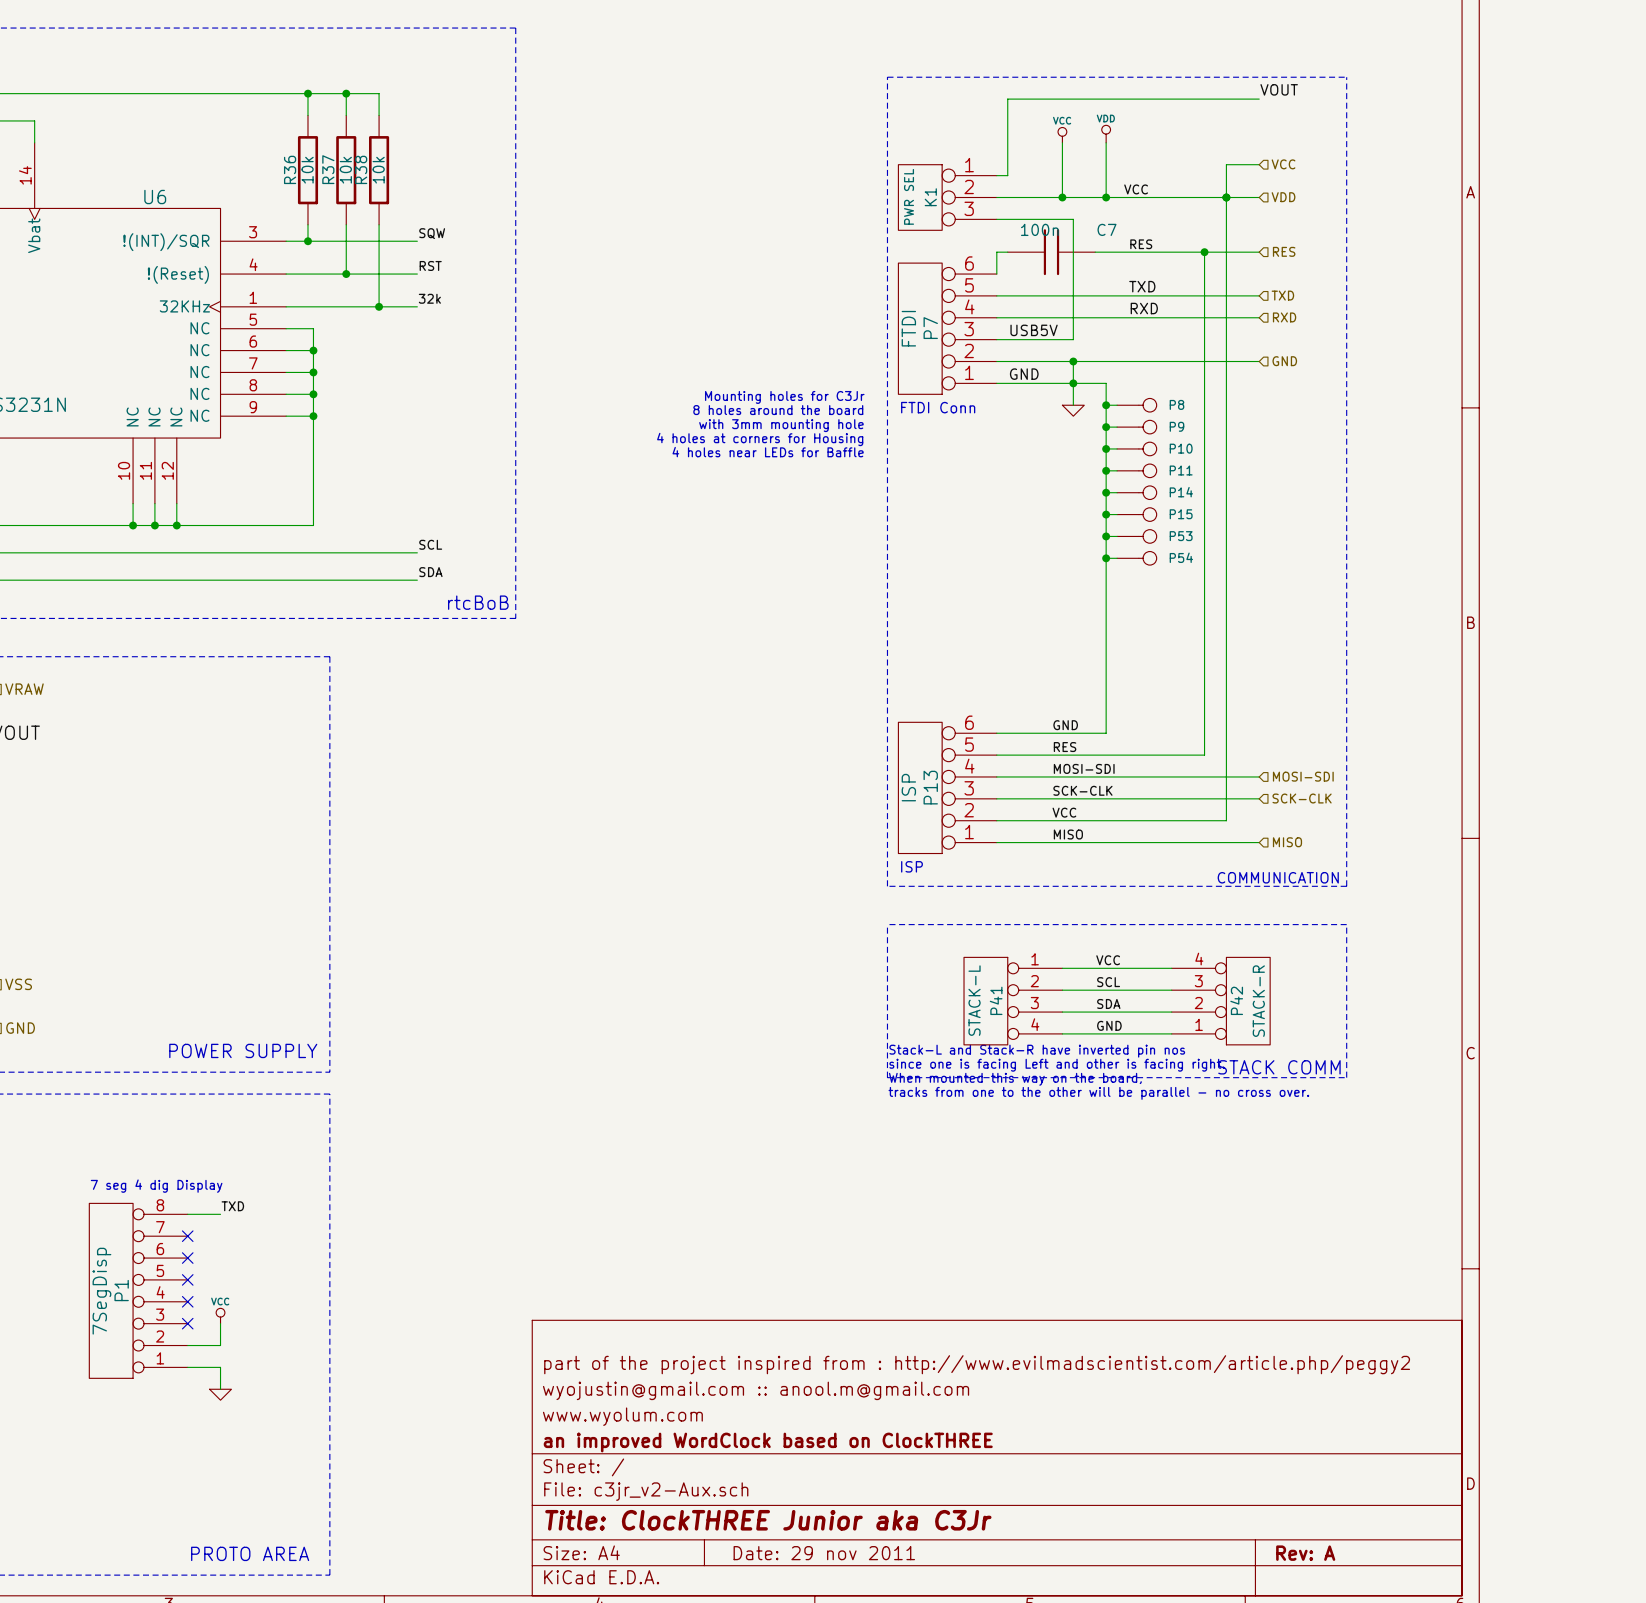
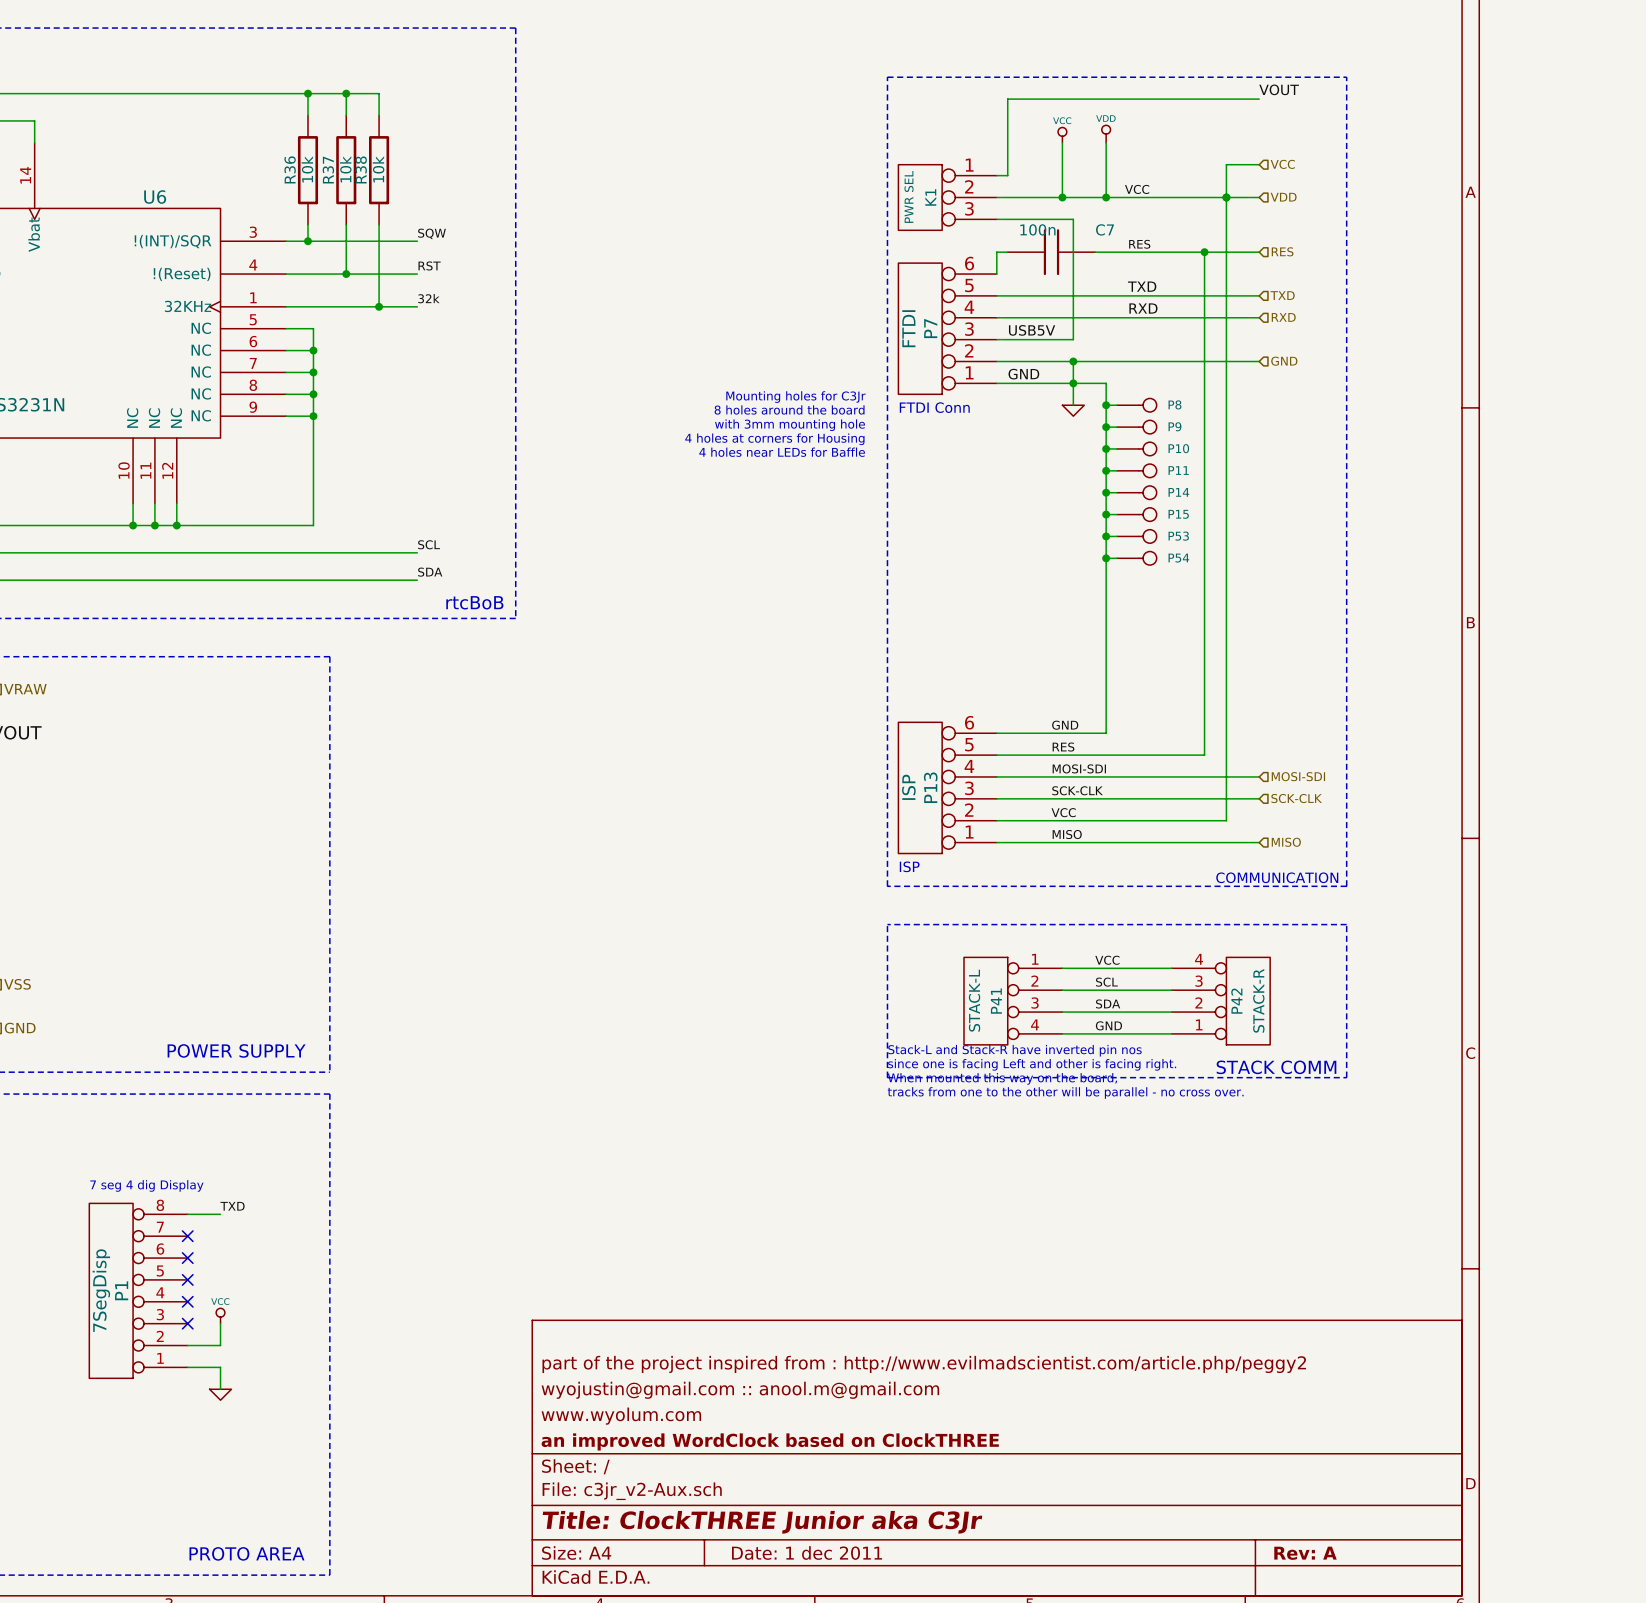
title block: Date: 29 nov 2011 (824, 1553) -> Date: 1 dec 2011 (807, 1552)

